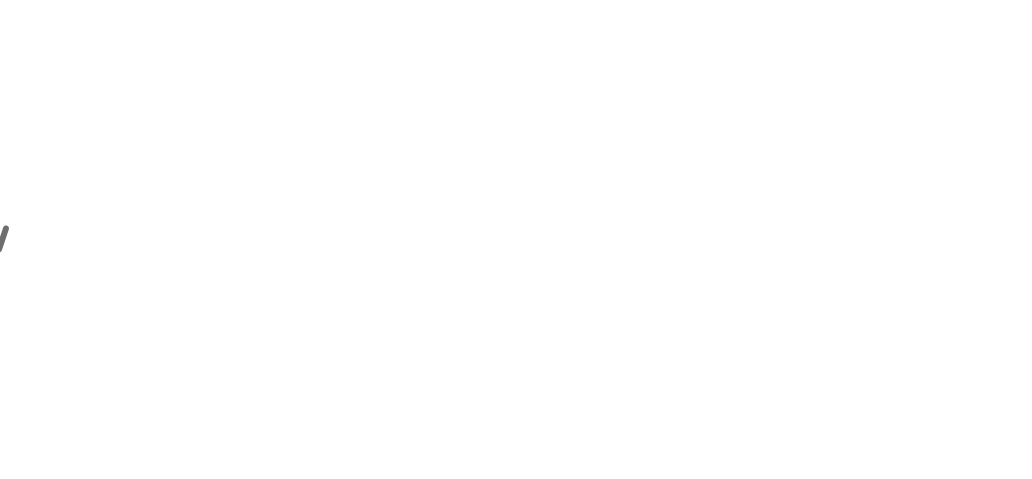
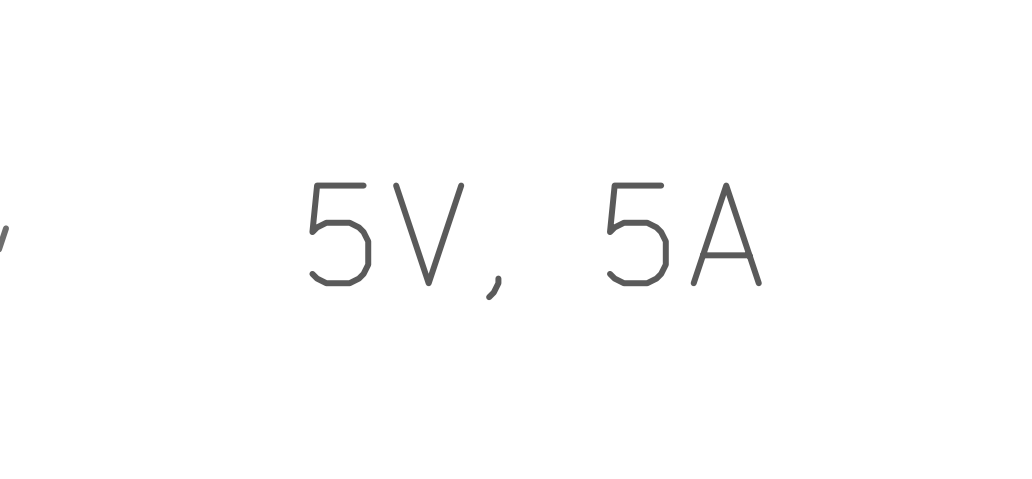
text: none -> 5V, 5A (535, 241)

